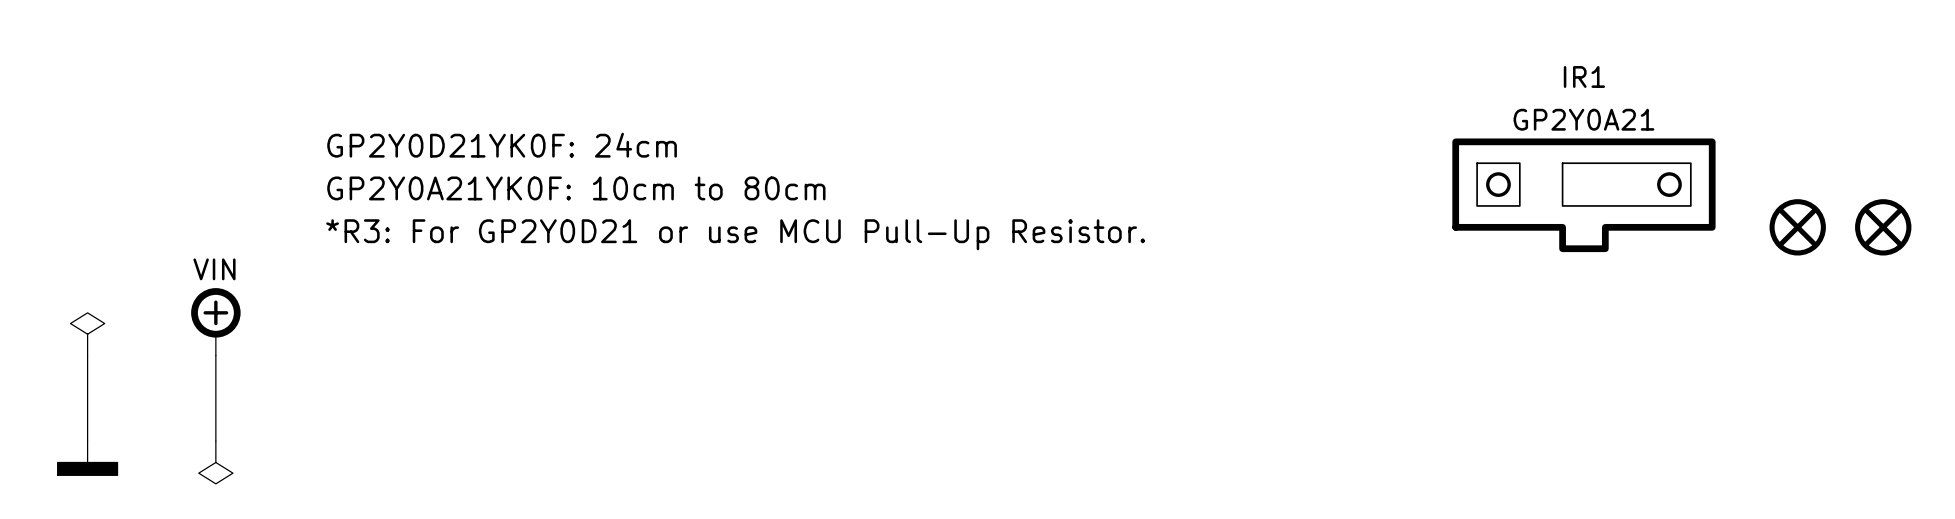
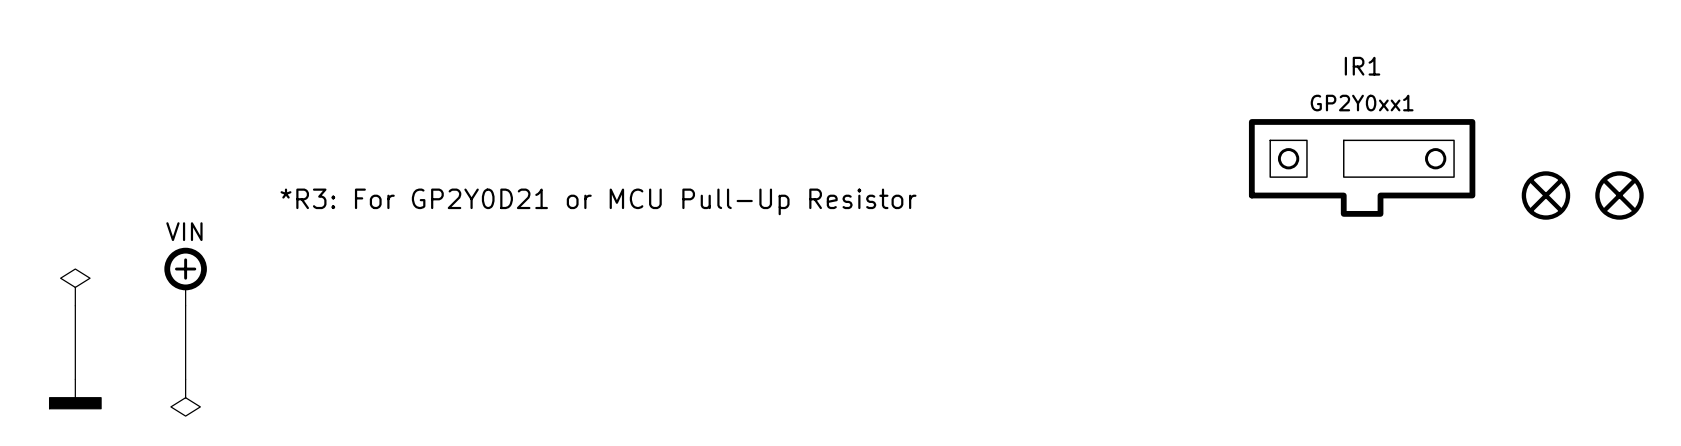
IR1 value: GP2Y0A21 (1583, 119) -> GP2Y0xx1 (1362, 103)
text: GP2Y0D21YK0F: 24cm (502, 145) -> none
text: GP2Y0A21YK0F: 10cm to 80cm (576, 188) -> none
text: *R3: For GP2Y0D21 or use MCU Pull-Up Resistor. (735, 234) -> *R3: For GP2Y0D21 or MCU Pull-Up Resistor (598, 201)

